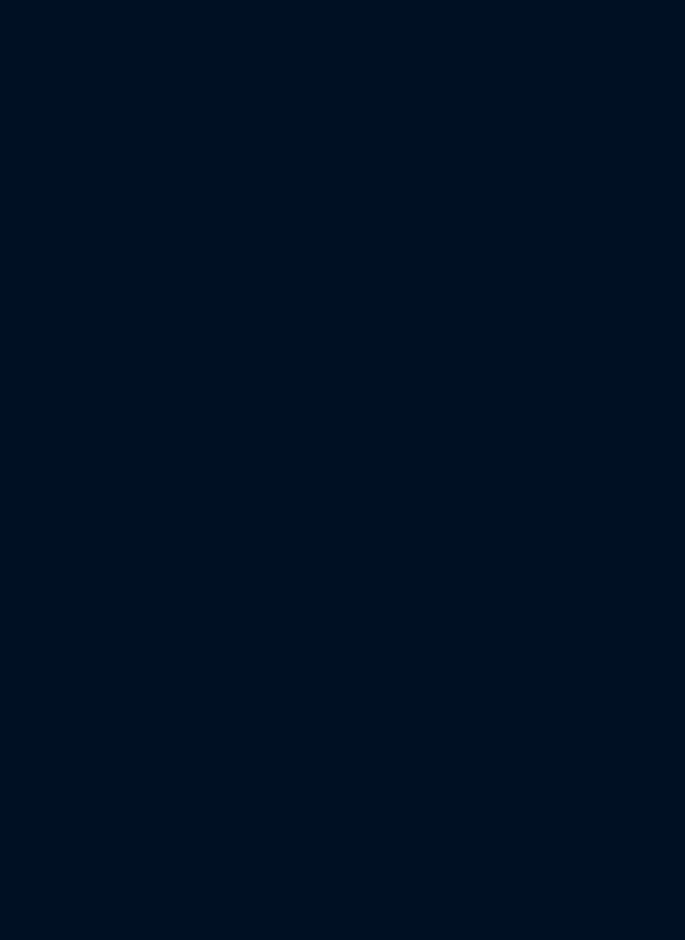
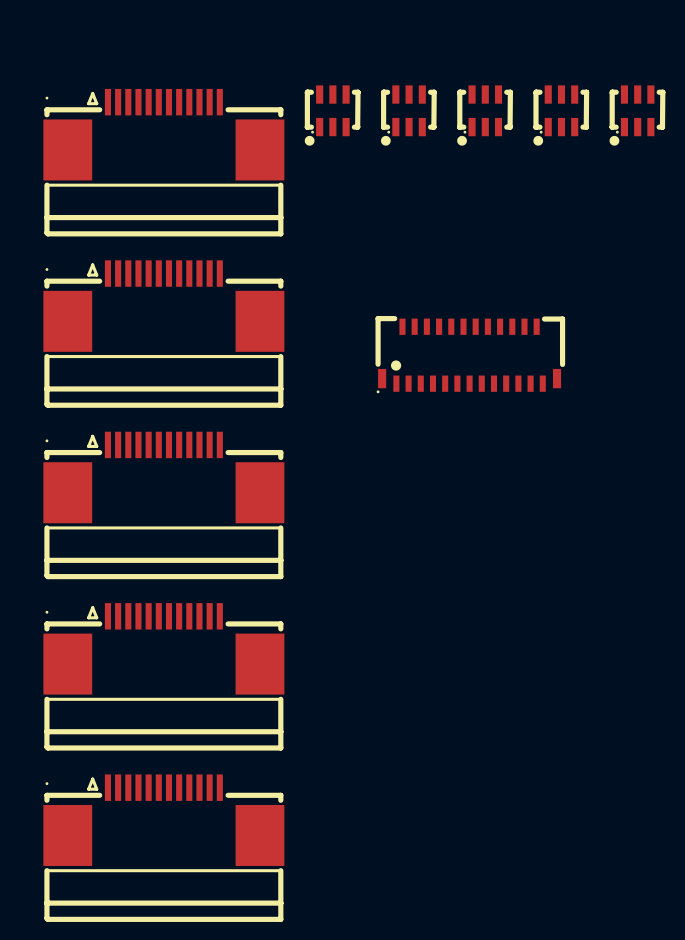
part: none -> (332, 115)
part: none -> (408, 115)
part: none -> (485, 115)
part: none -> (561, 115)
part: none -> (637, 115)
part: none -> (163, 162)
part: none -> (163, 334)
part: none -> (470, 354)
part: none -> (163, 505)
part: none -> (163, 676)
part: none -> (163, 848)

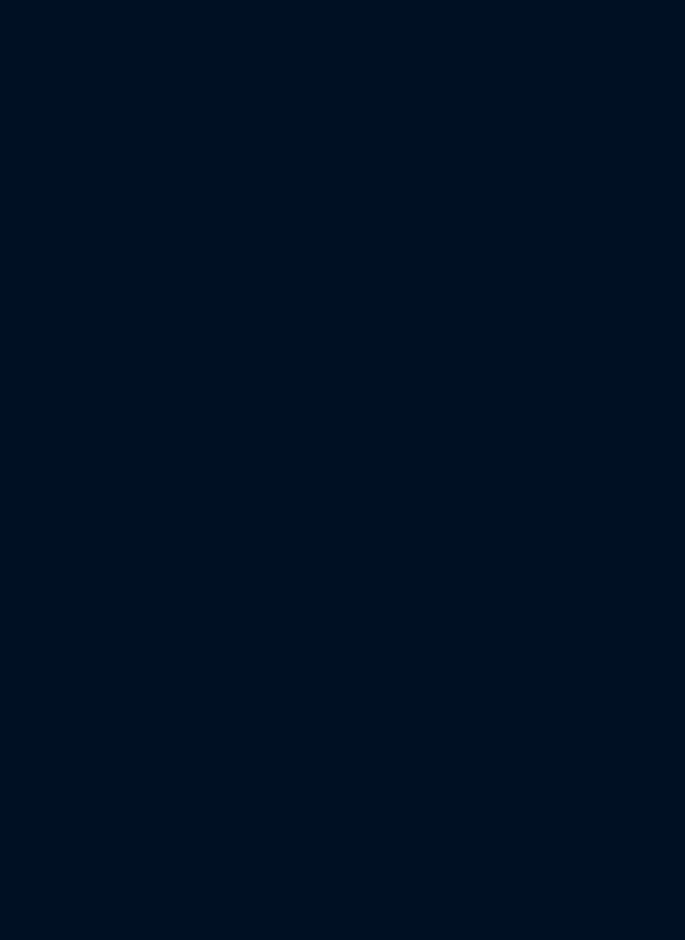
part: (332, 115) -> none
part: (408, 115) -> none
part: (485, 115) -> none
part: (561, 115) -> none
part: (637, 115) -> none
part: (163, 162) -> none
part: (163, 334) -> none
part: (470, 354) -> none
part: (163, 505) -> none
part: (163, 676) -> none
part: (163, 848) -> none

